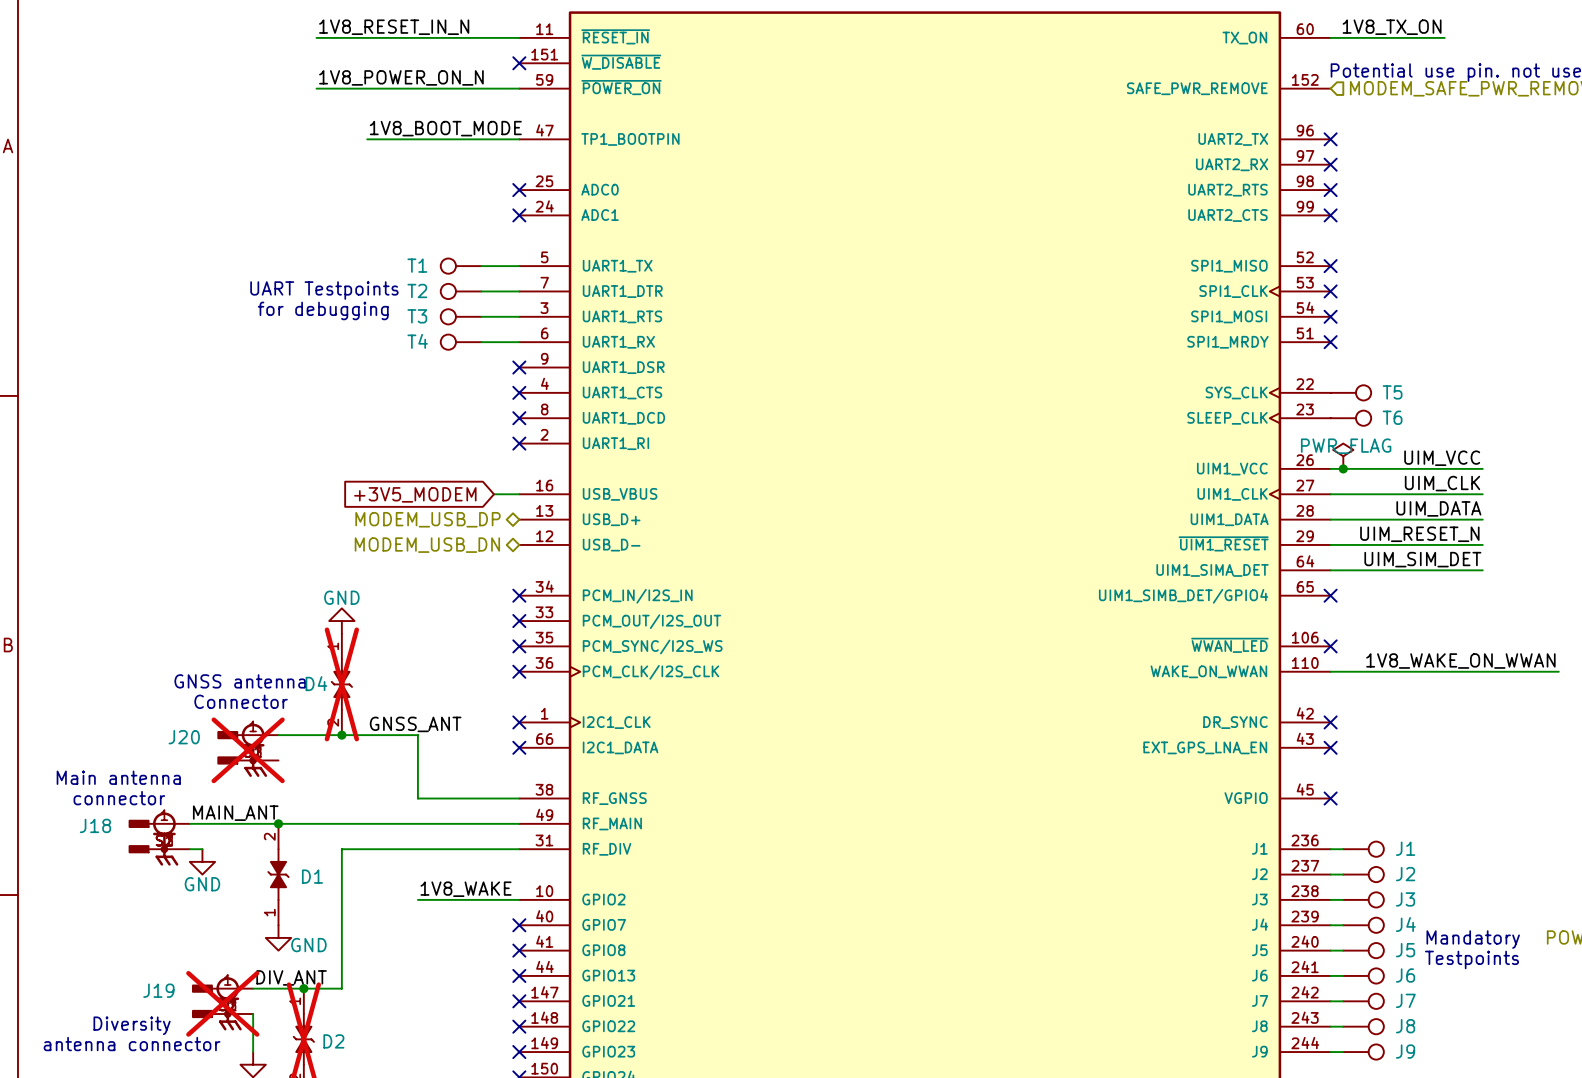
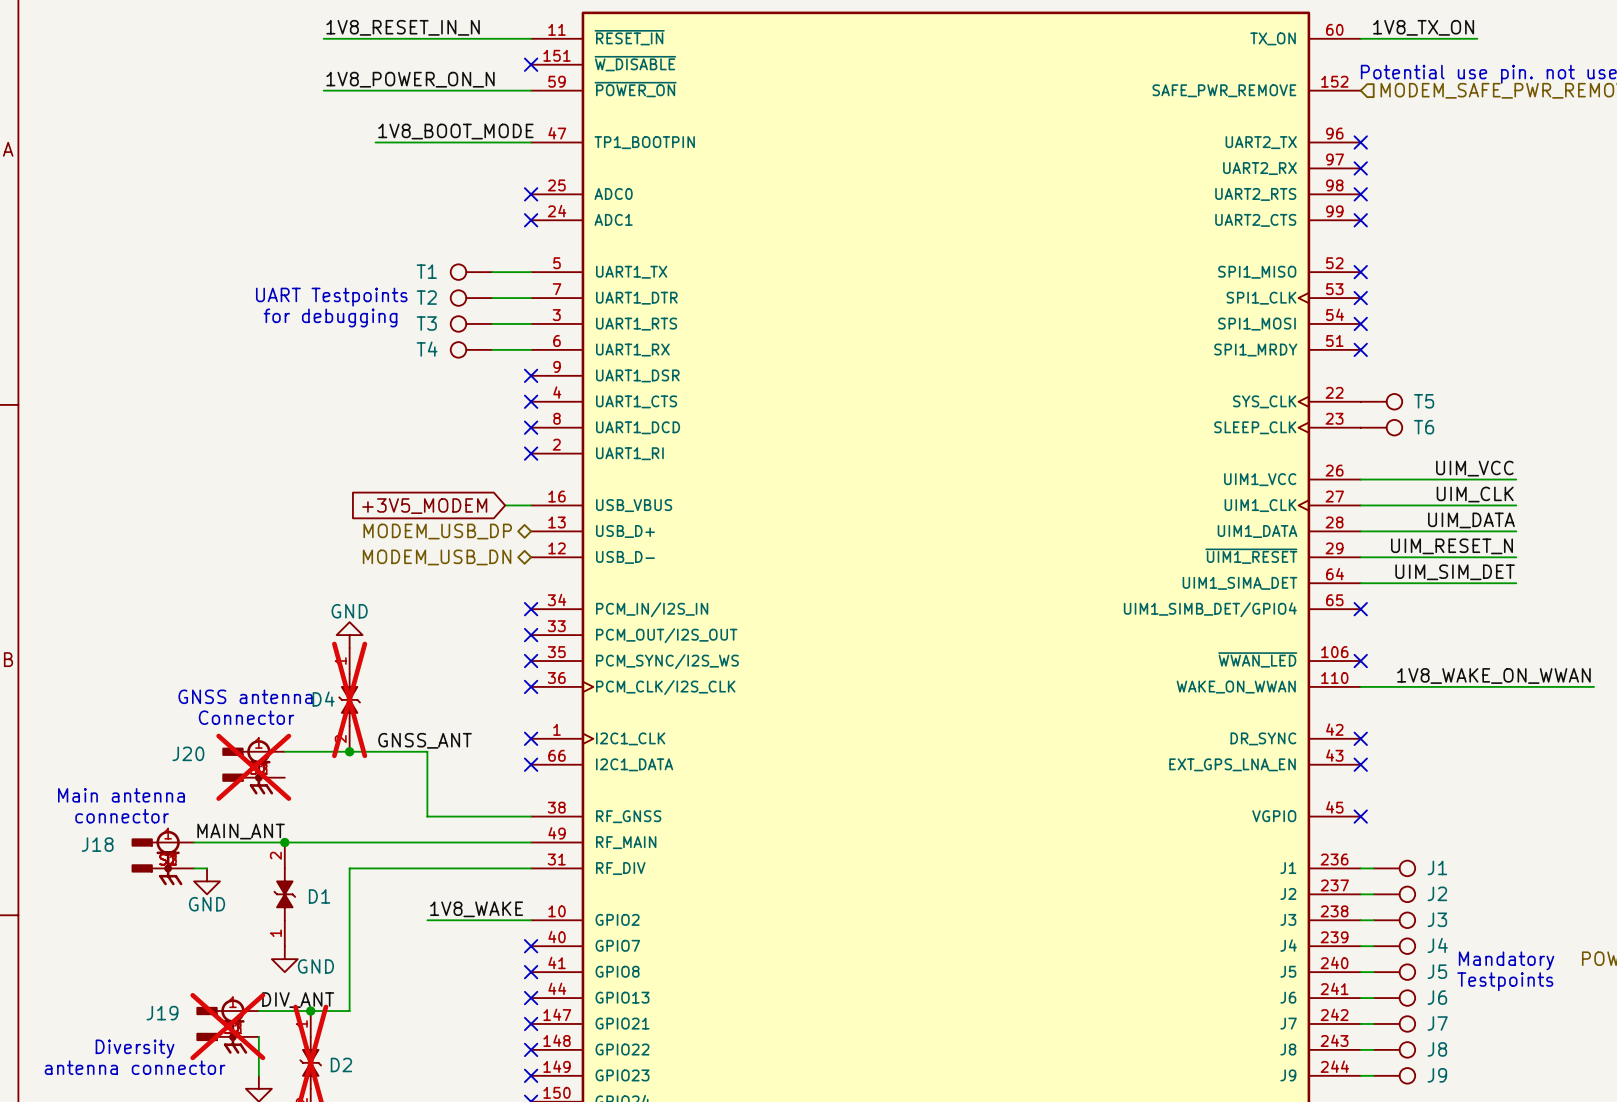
power symbol: PWR_FLAG (1343, 456) -> none
junction: (1343, 468) -> none

